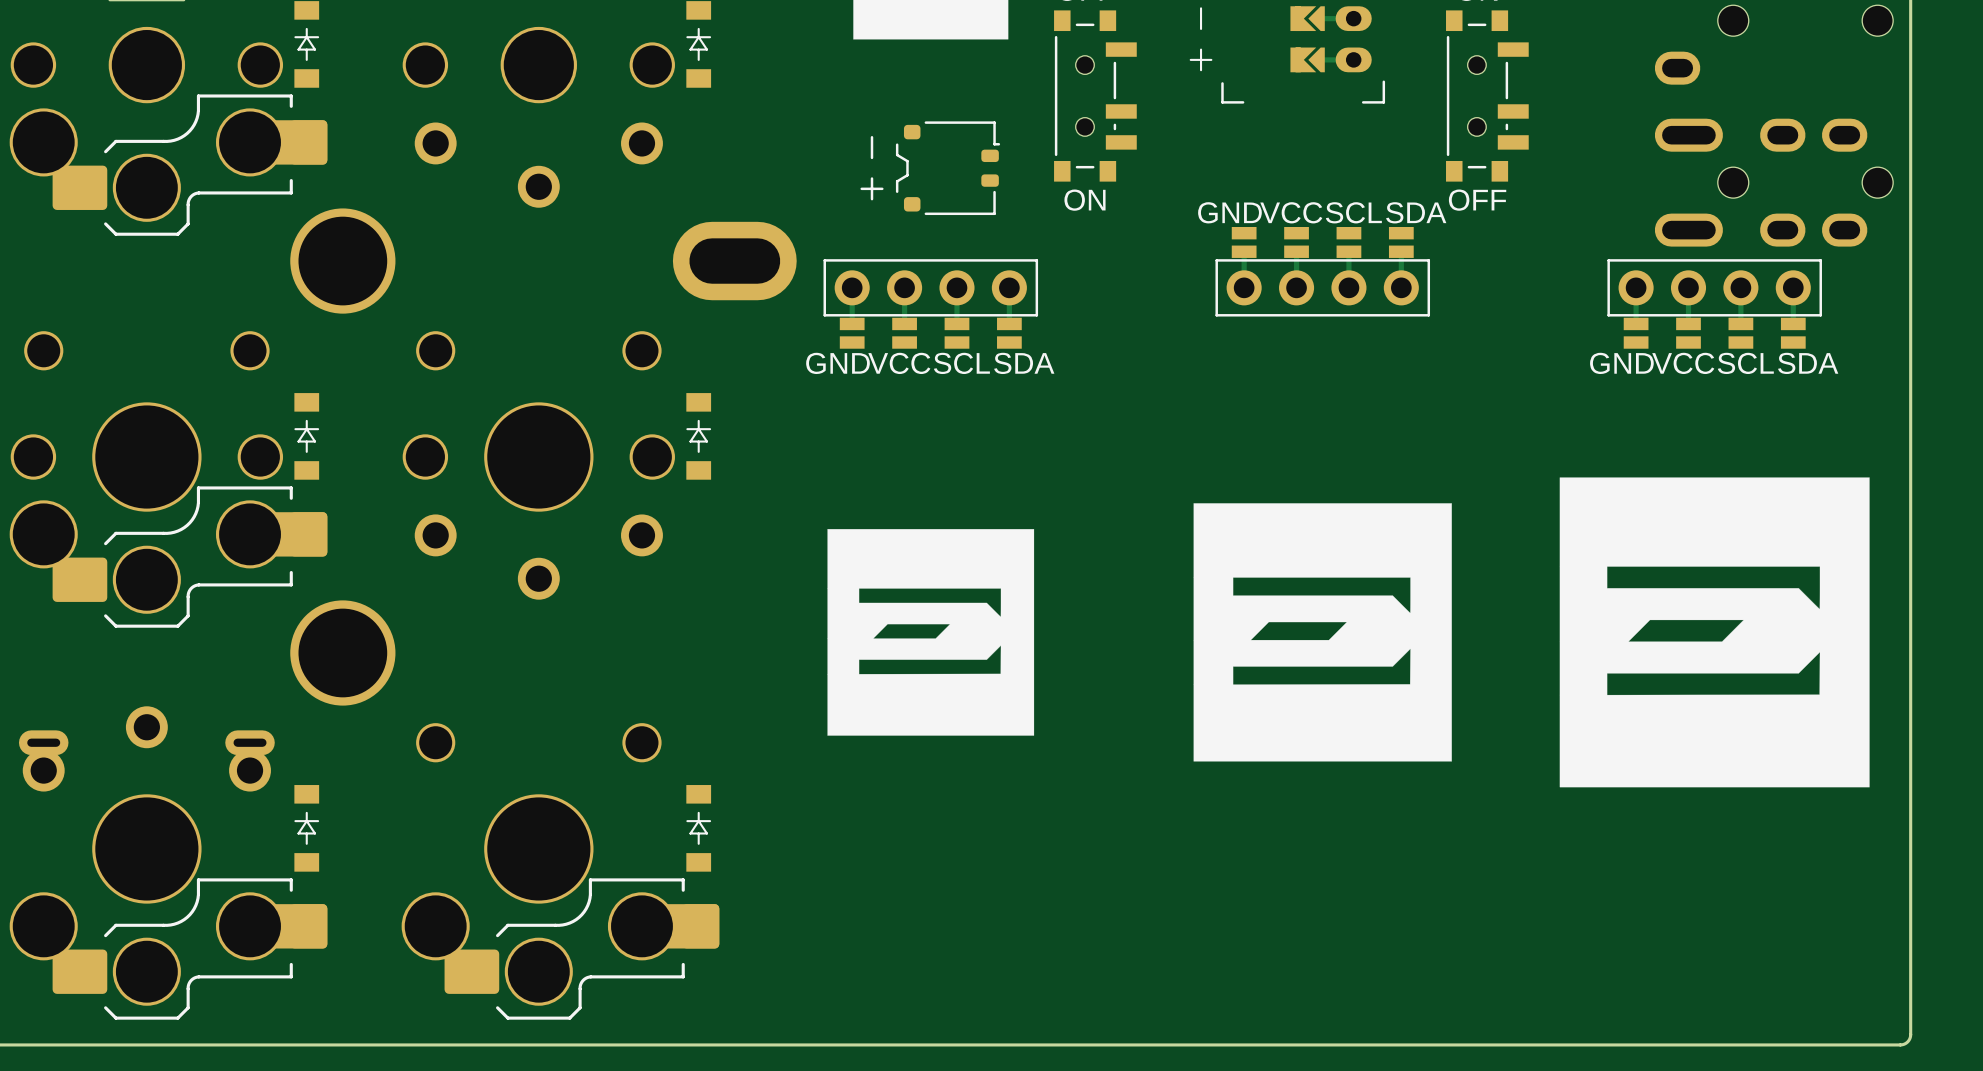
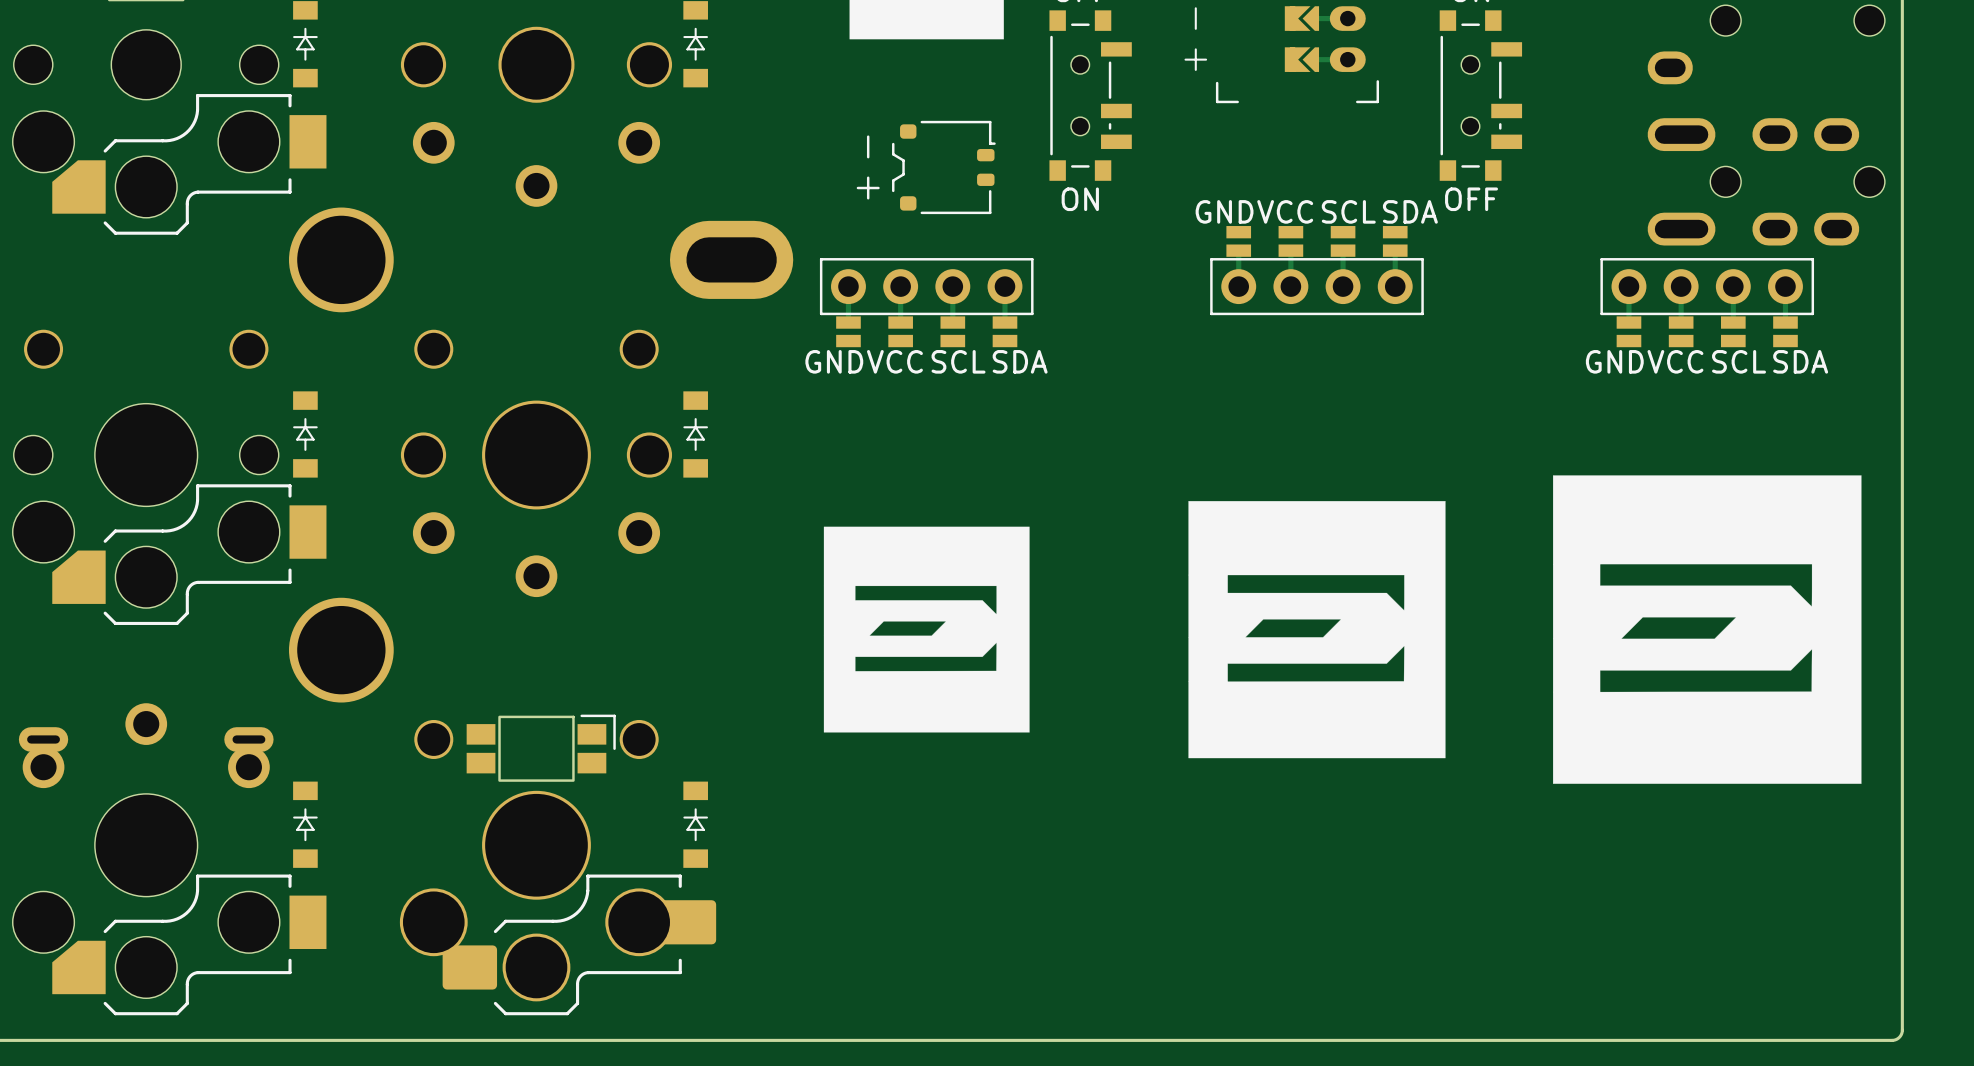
part footprint: [9, 26, 328, 236] -> [12, 29, 327, 235]
part footprint: [9, 331, 328, 628] -> [12, 329, 327, 625]
part footprint: [9, 706, 328, 1020] -> [12, 703, 327, 1016]
part footprint: [401, 723, 720, 1020] -> [399, 719, 717, 1016]
part: none -> (541, 748)

